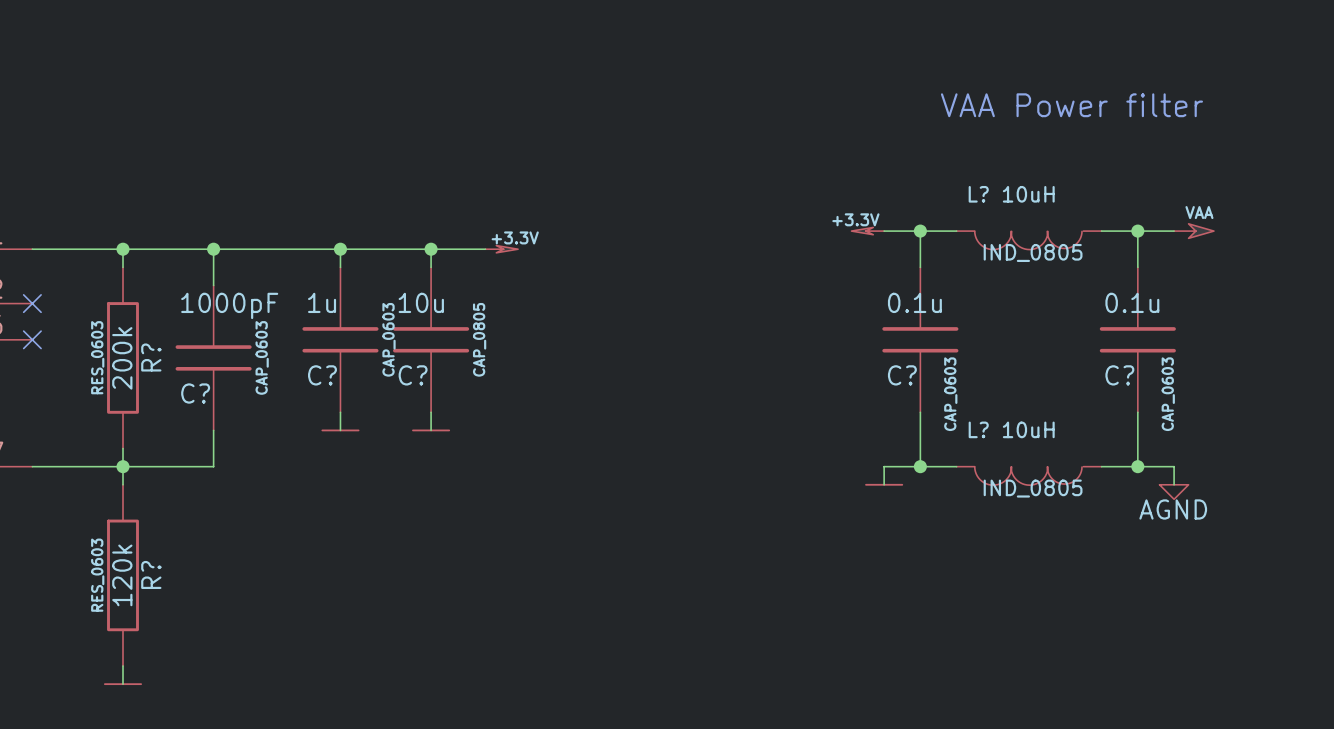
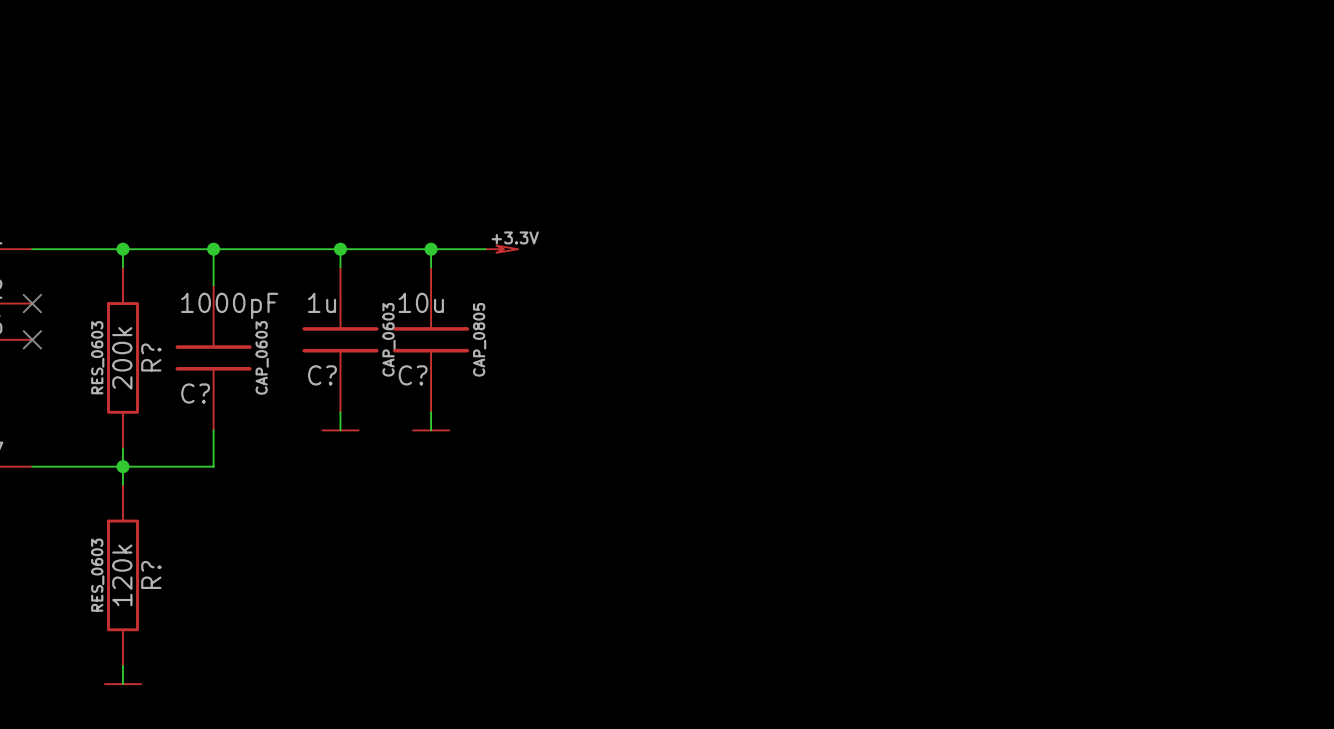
text: VAA Power filter (1071, 105) -> none
power symbol: +3.3V (867, 231) -> none
wire: (884, 231) (956, 231) -> none
wire: (920, 231) (920, 267) -> none
junction: (920, 231) -> none
wire: (1101, 231) (1174, 231) -> none
wire: (1137, 231) (1137, 267) -> none
junction: (1137, 231) -> none
power symbol: VAA (1194, 231) -> none
L?: 10uH (1029, 240) -> none
C?: 0.1u (920, 339) -> none
C?: 0.1u (1137, 339) -> none
wire: (920, 412) (920, 466) -> none
wire: (1137, 412) (1137, 466) -> none
junction: (920, 466) -> none
wire: (956, 466) (884, 466) (884, 484) -> none
wire: (1101, 466) (1174, 466) (1174, 484) -> none
junction: (1137, 466) -> none
L?: 10uH (1029, 475) -> none
power symbol: (884, 484) -> none
power symbol: AGND (1174, 492) -> none

